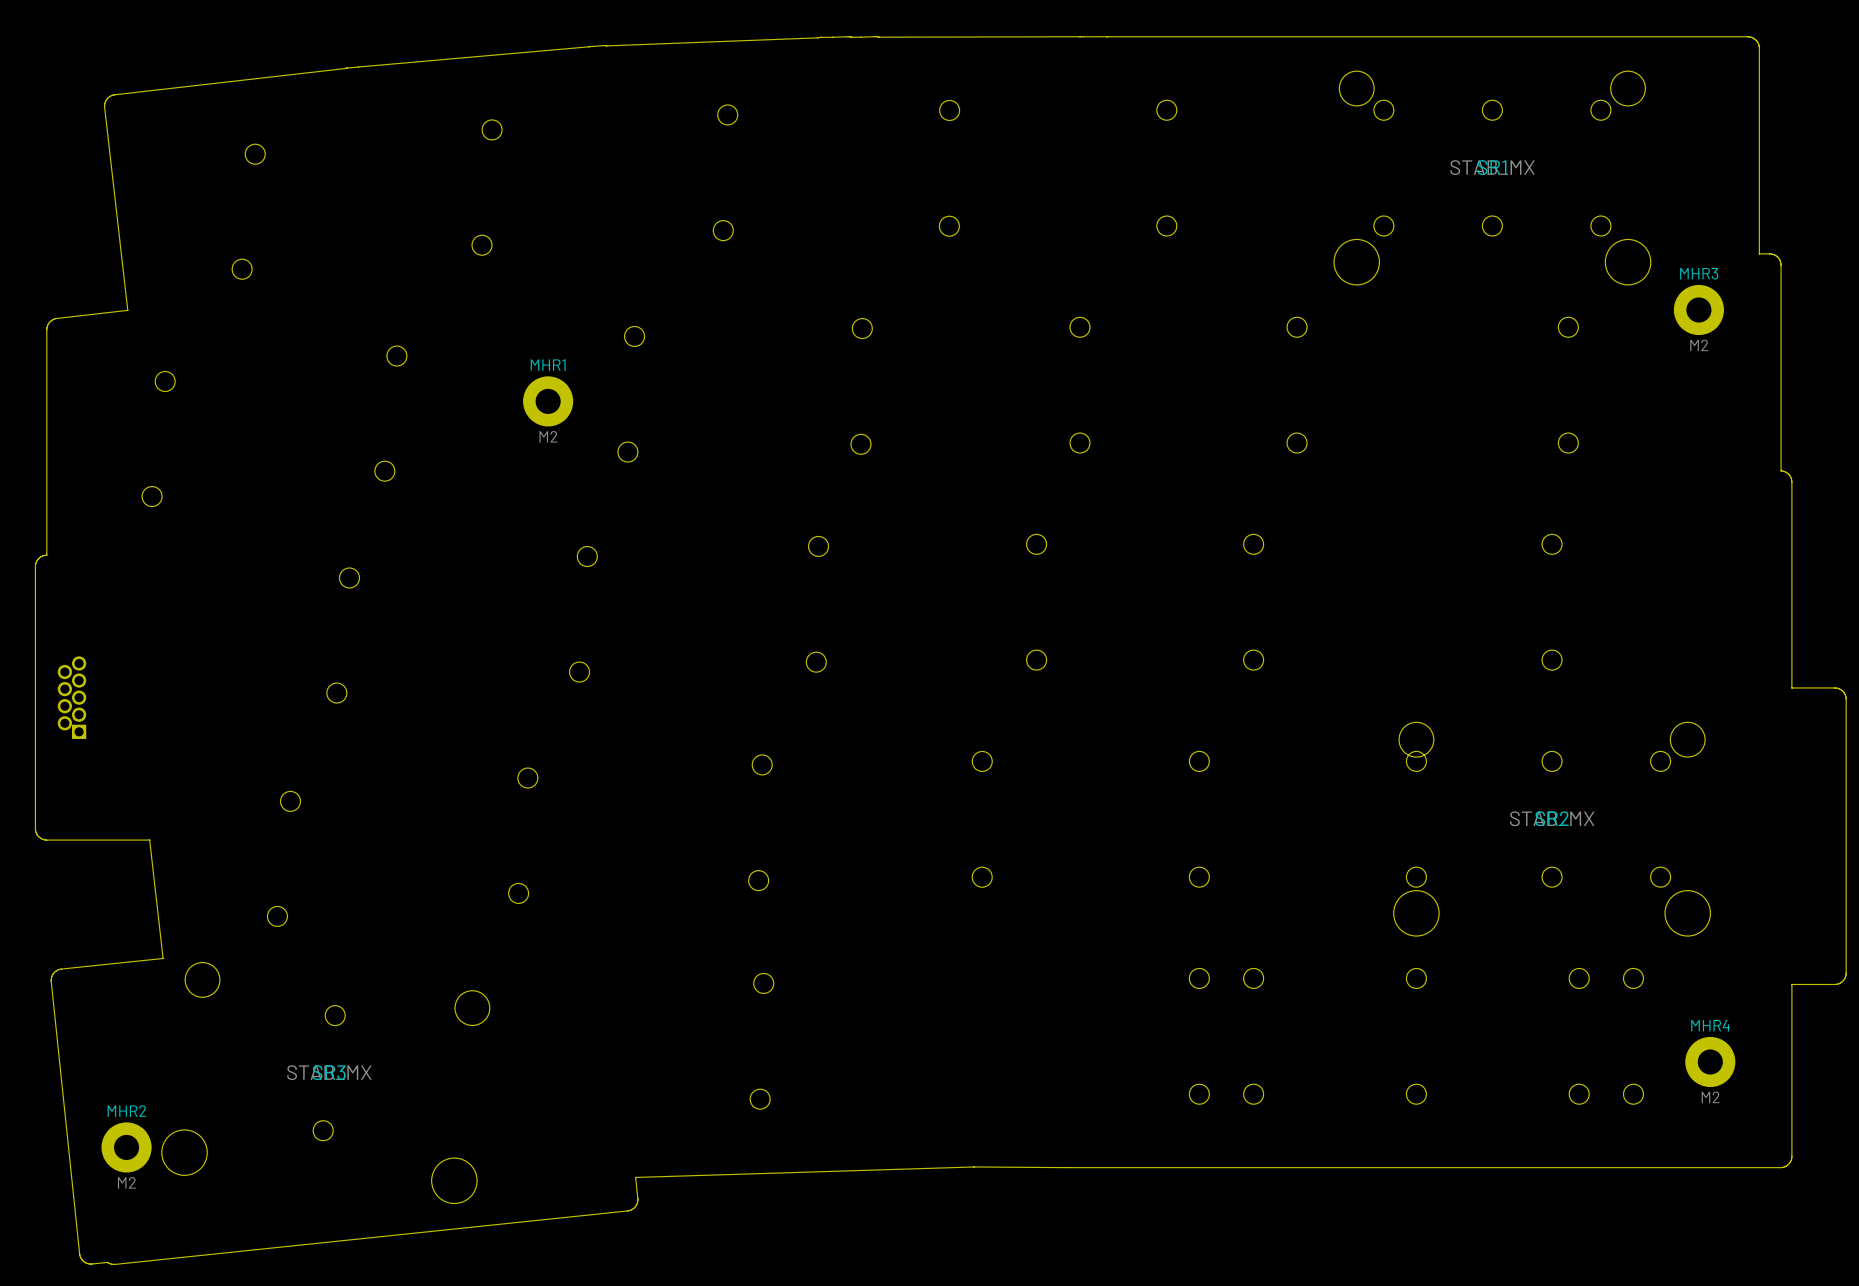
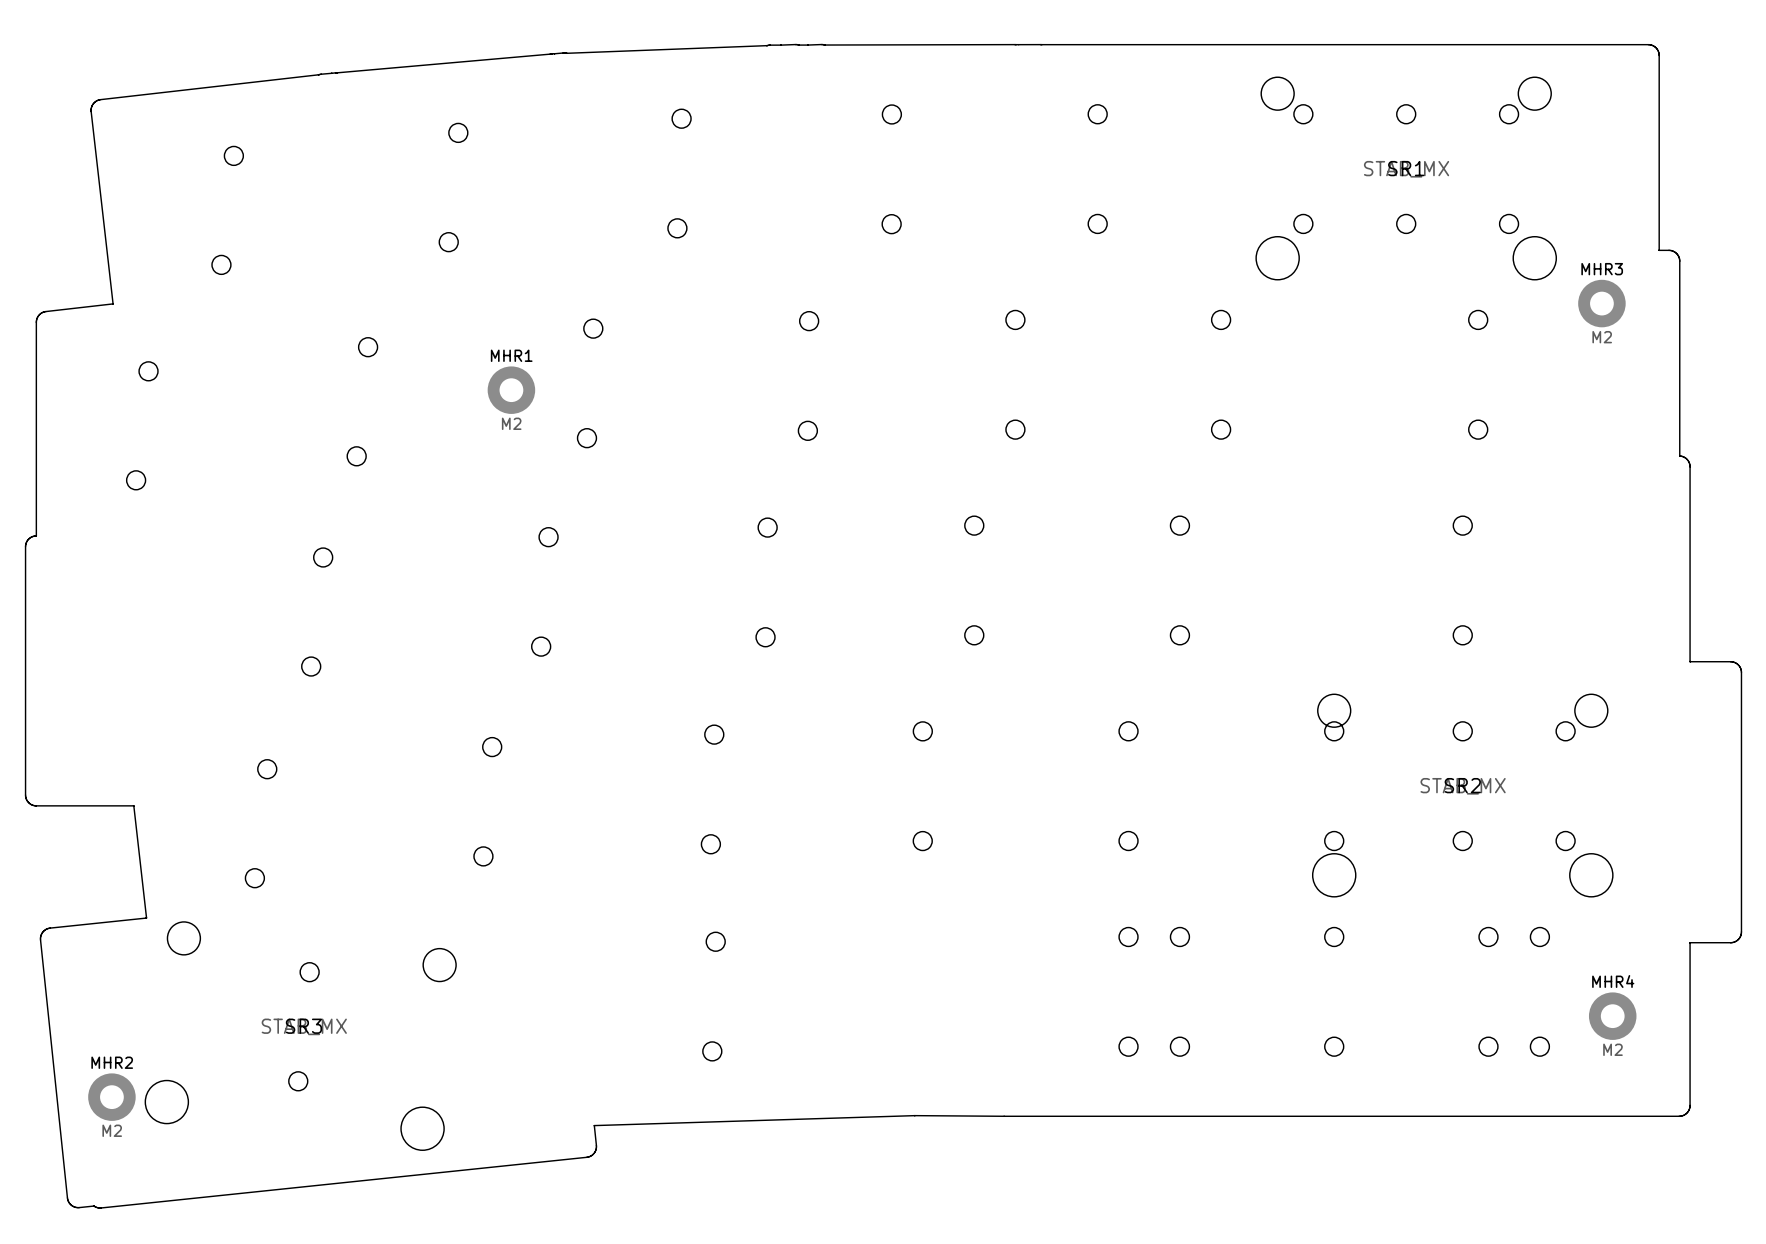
part: (71, 697) -> none

